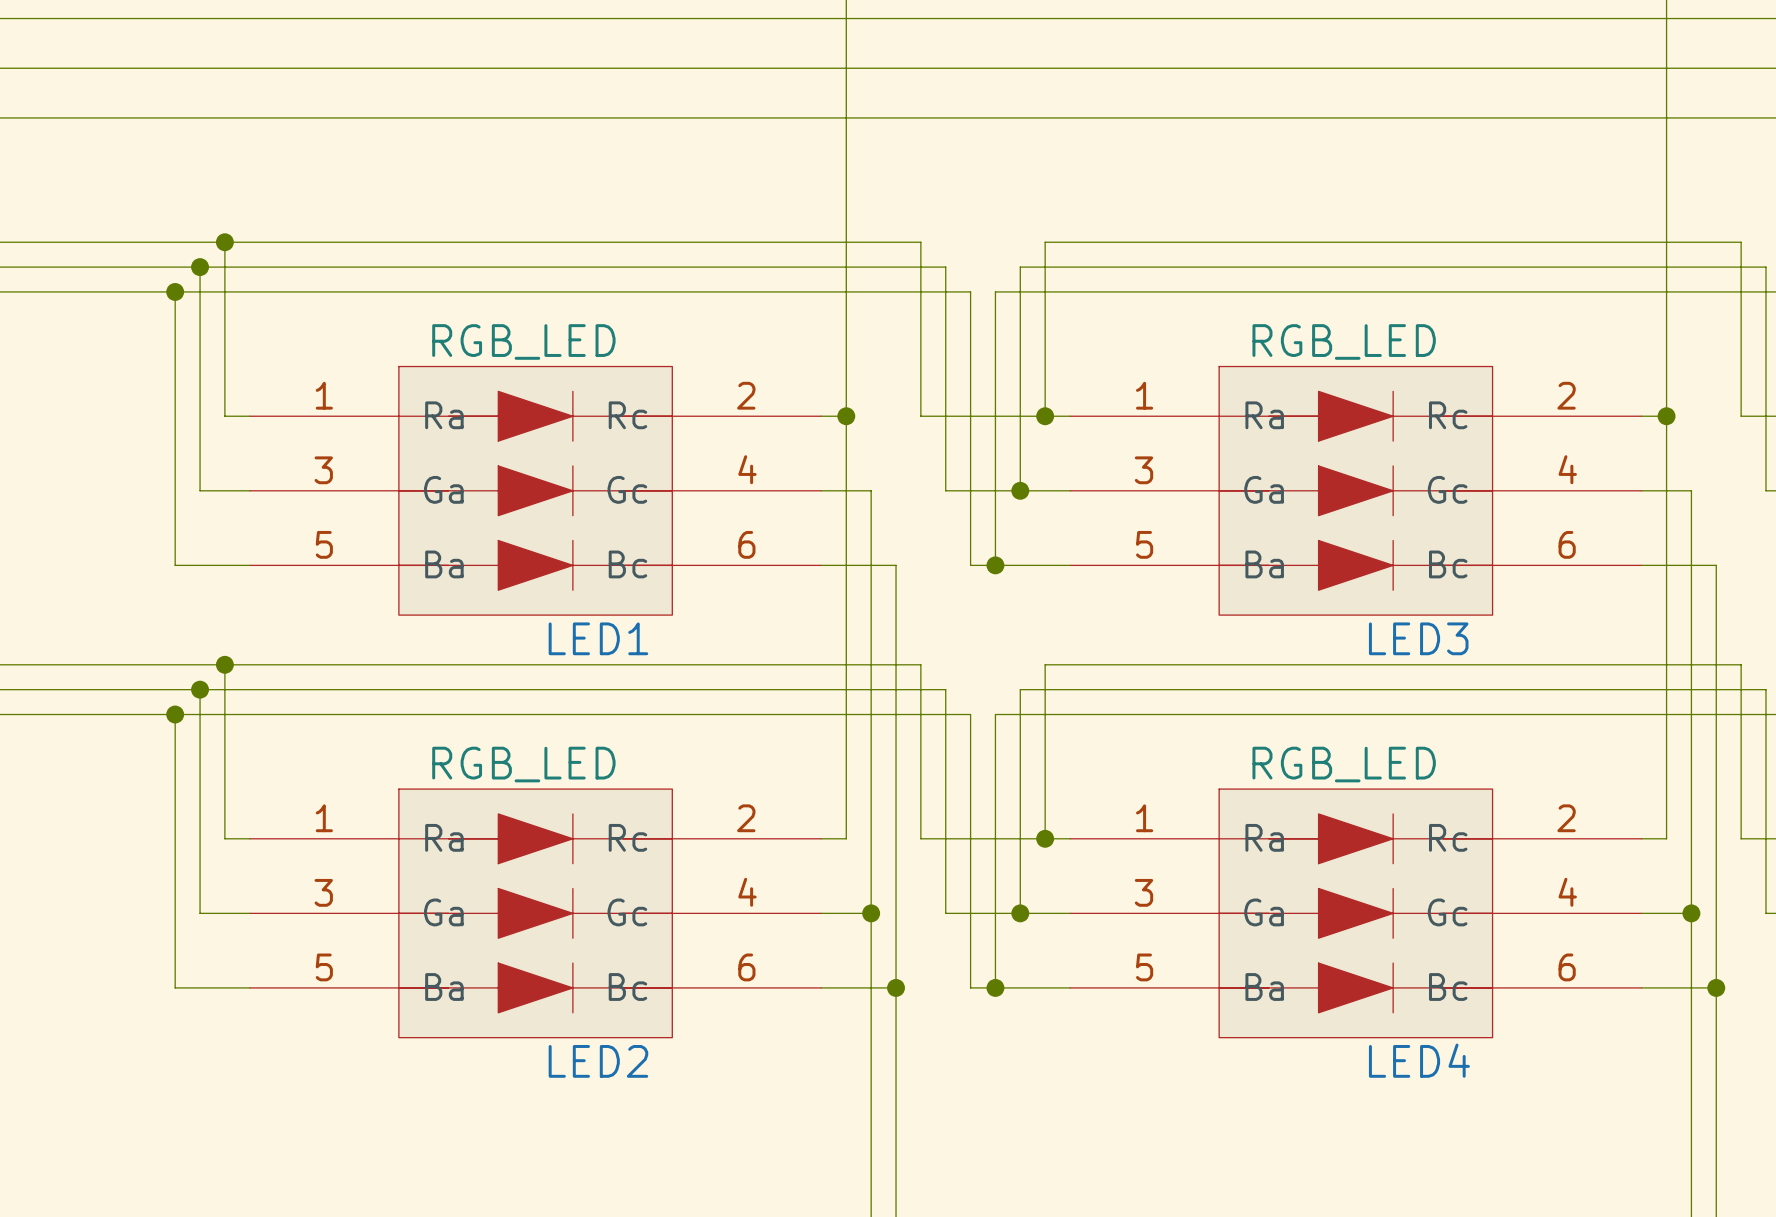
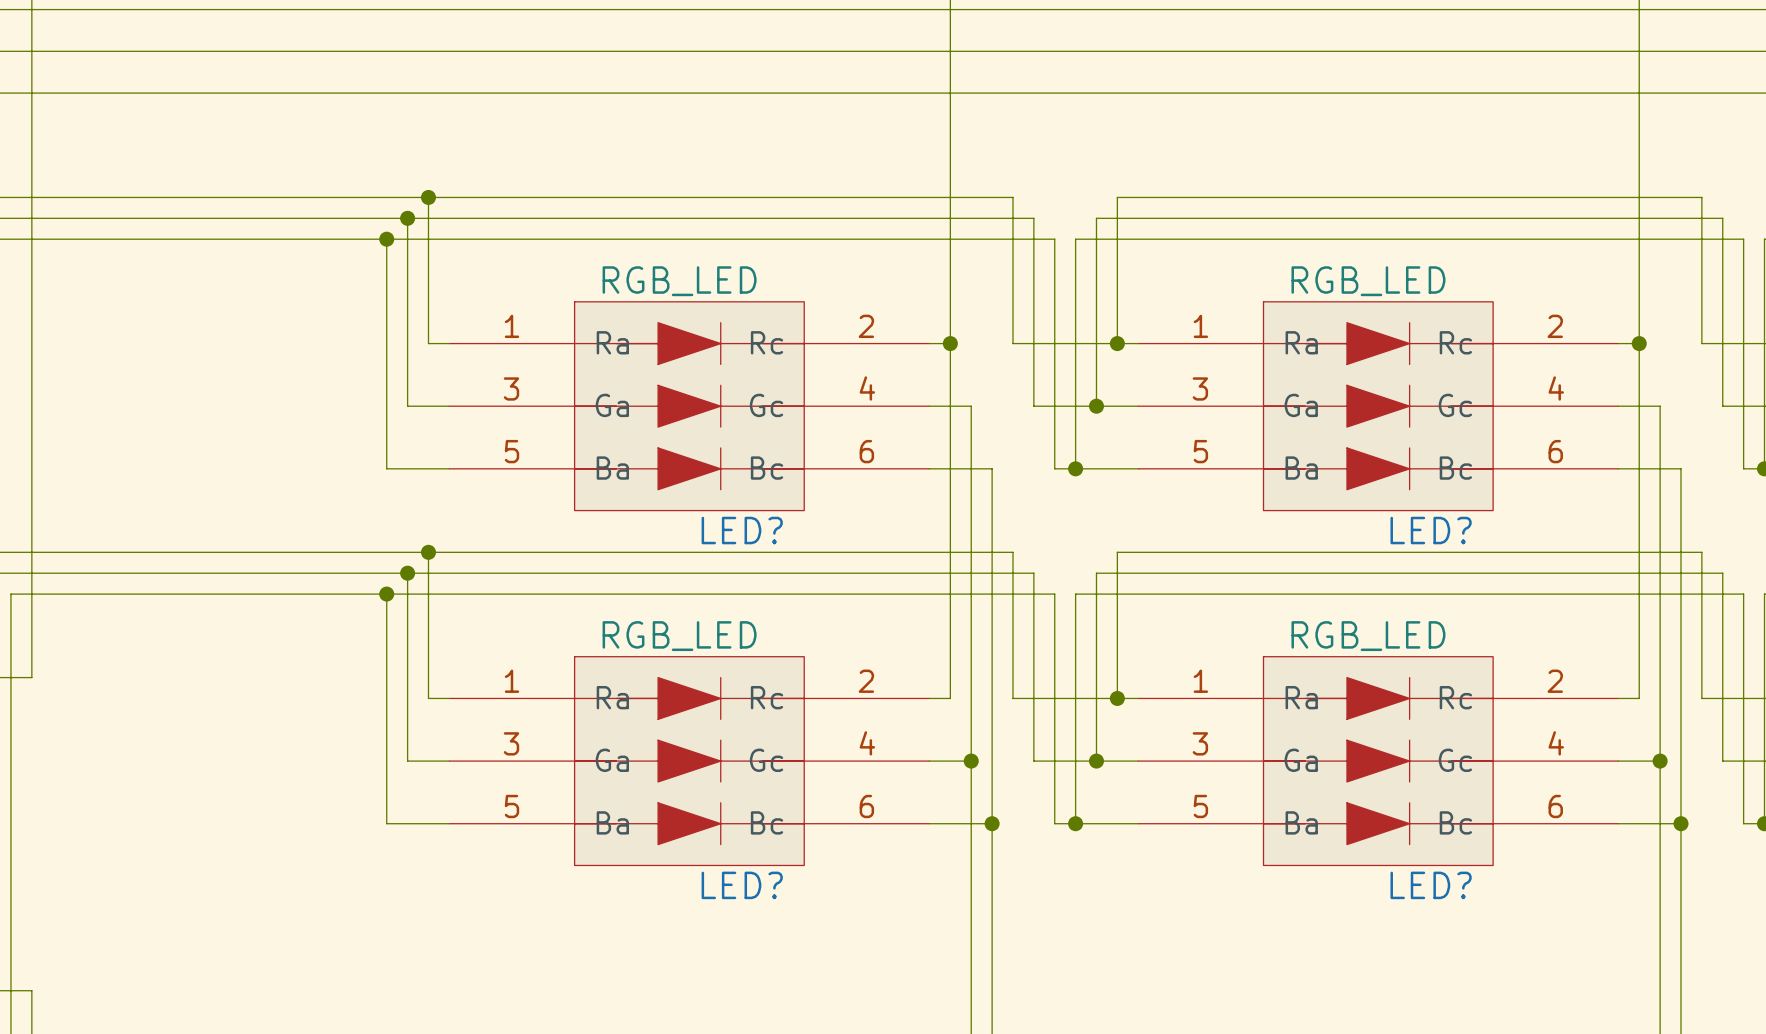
LED1 name: LED1 (598, 638) -> LED? (742, 530)
LED3 name: LED3 (1418, 638) -> LED? (1431, 530)
LED4 name: LED4 (1419, 1060) -> LED? (1431, 885)
LED2 name: LED2 (598, 1061) -> LED? (742, 885)

